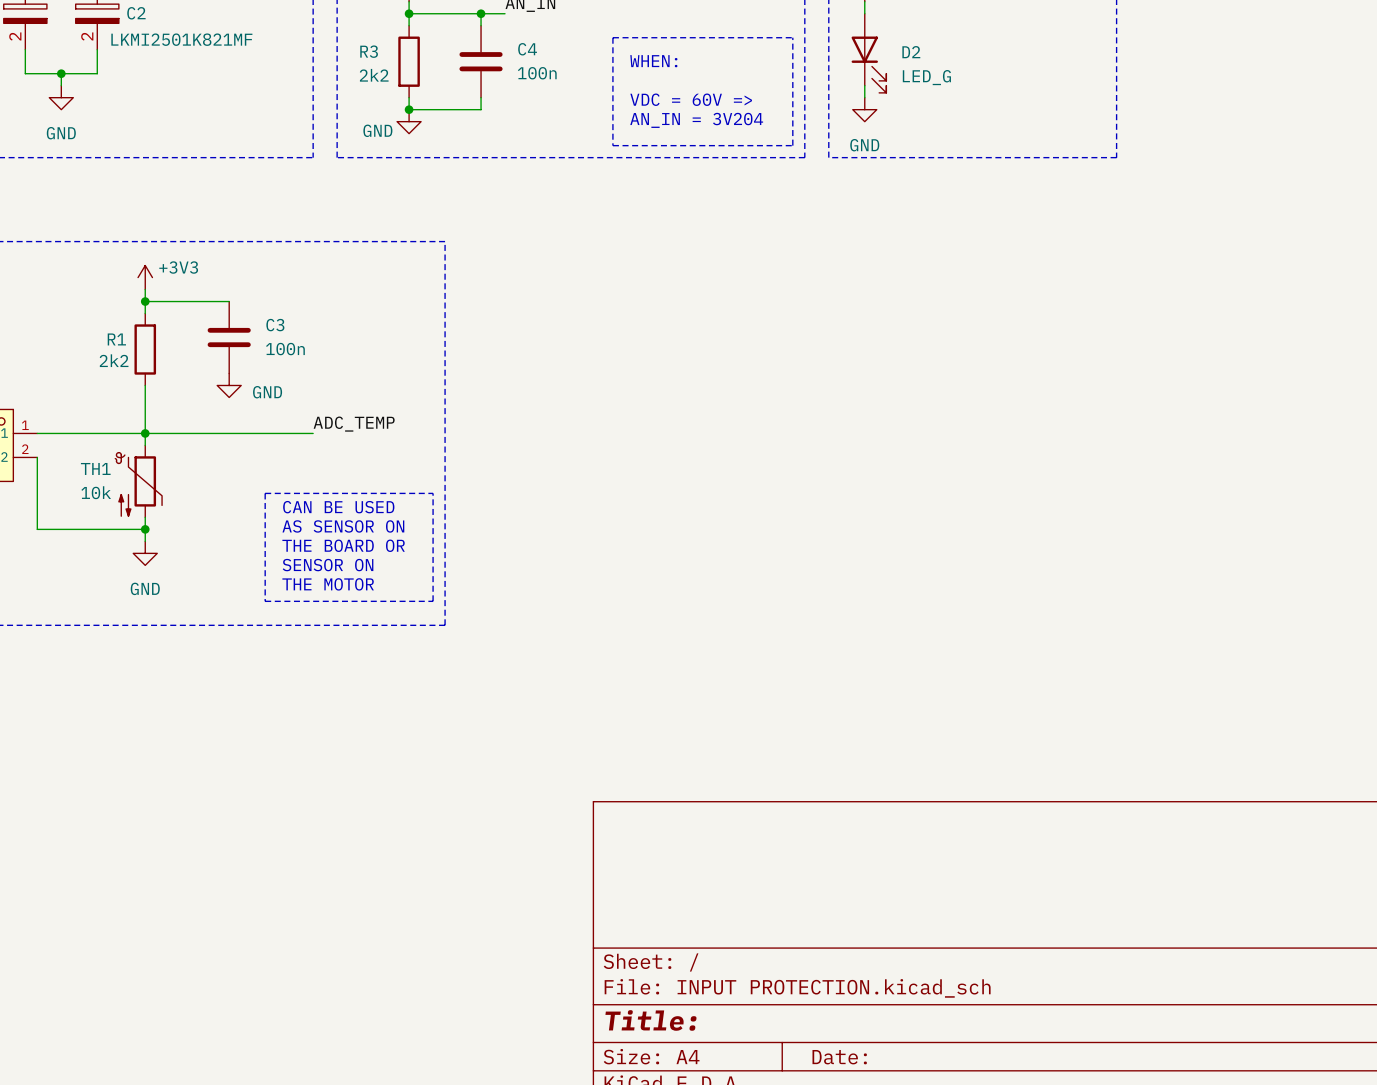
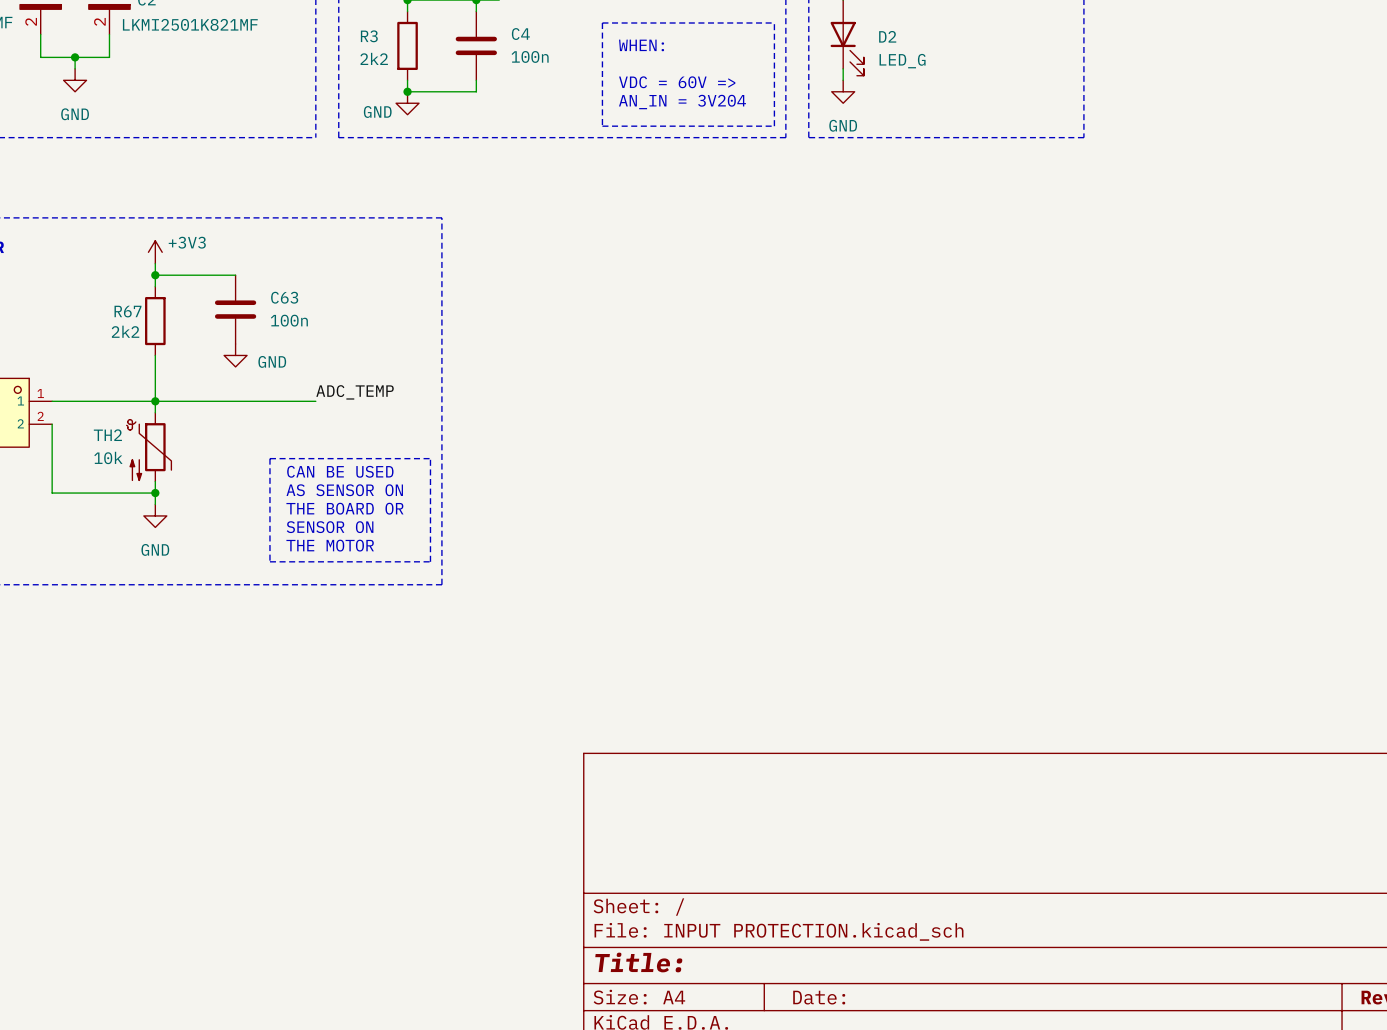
C3 name: C3 (275, 325) -> C63 (284, 297)
R1 name: R1 (116, 339) -> R67 (127, 311)
TH1 name: TH1 (95, 468) -> TH2 (107, 435)

